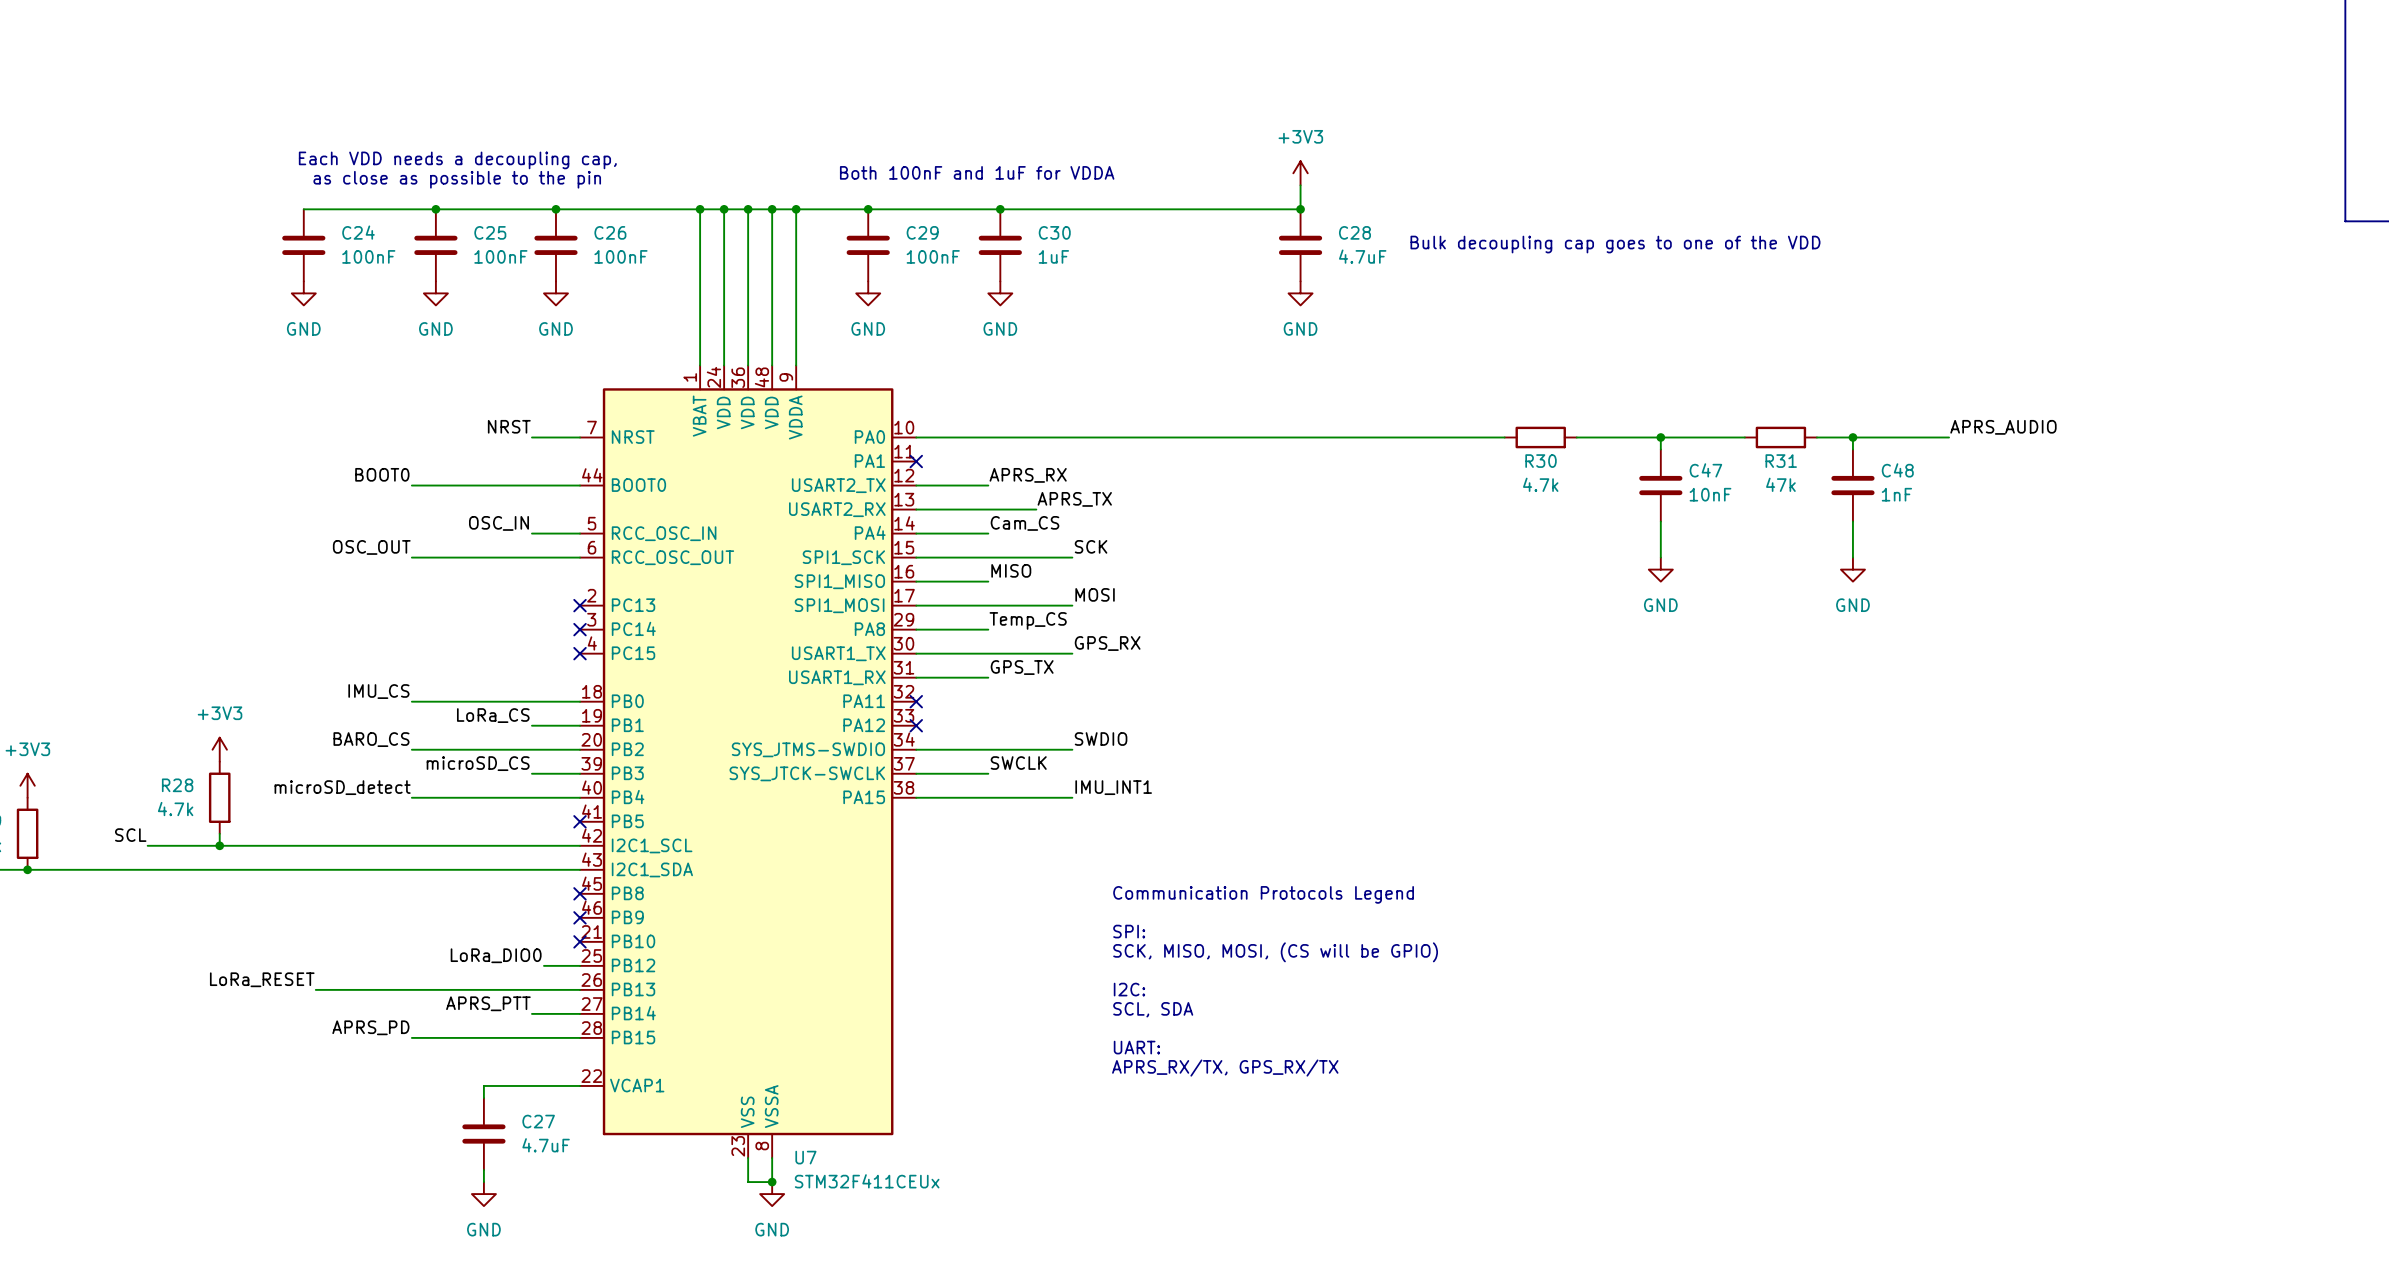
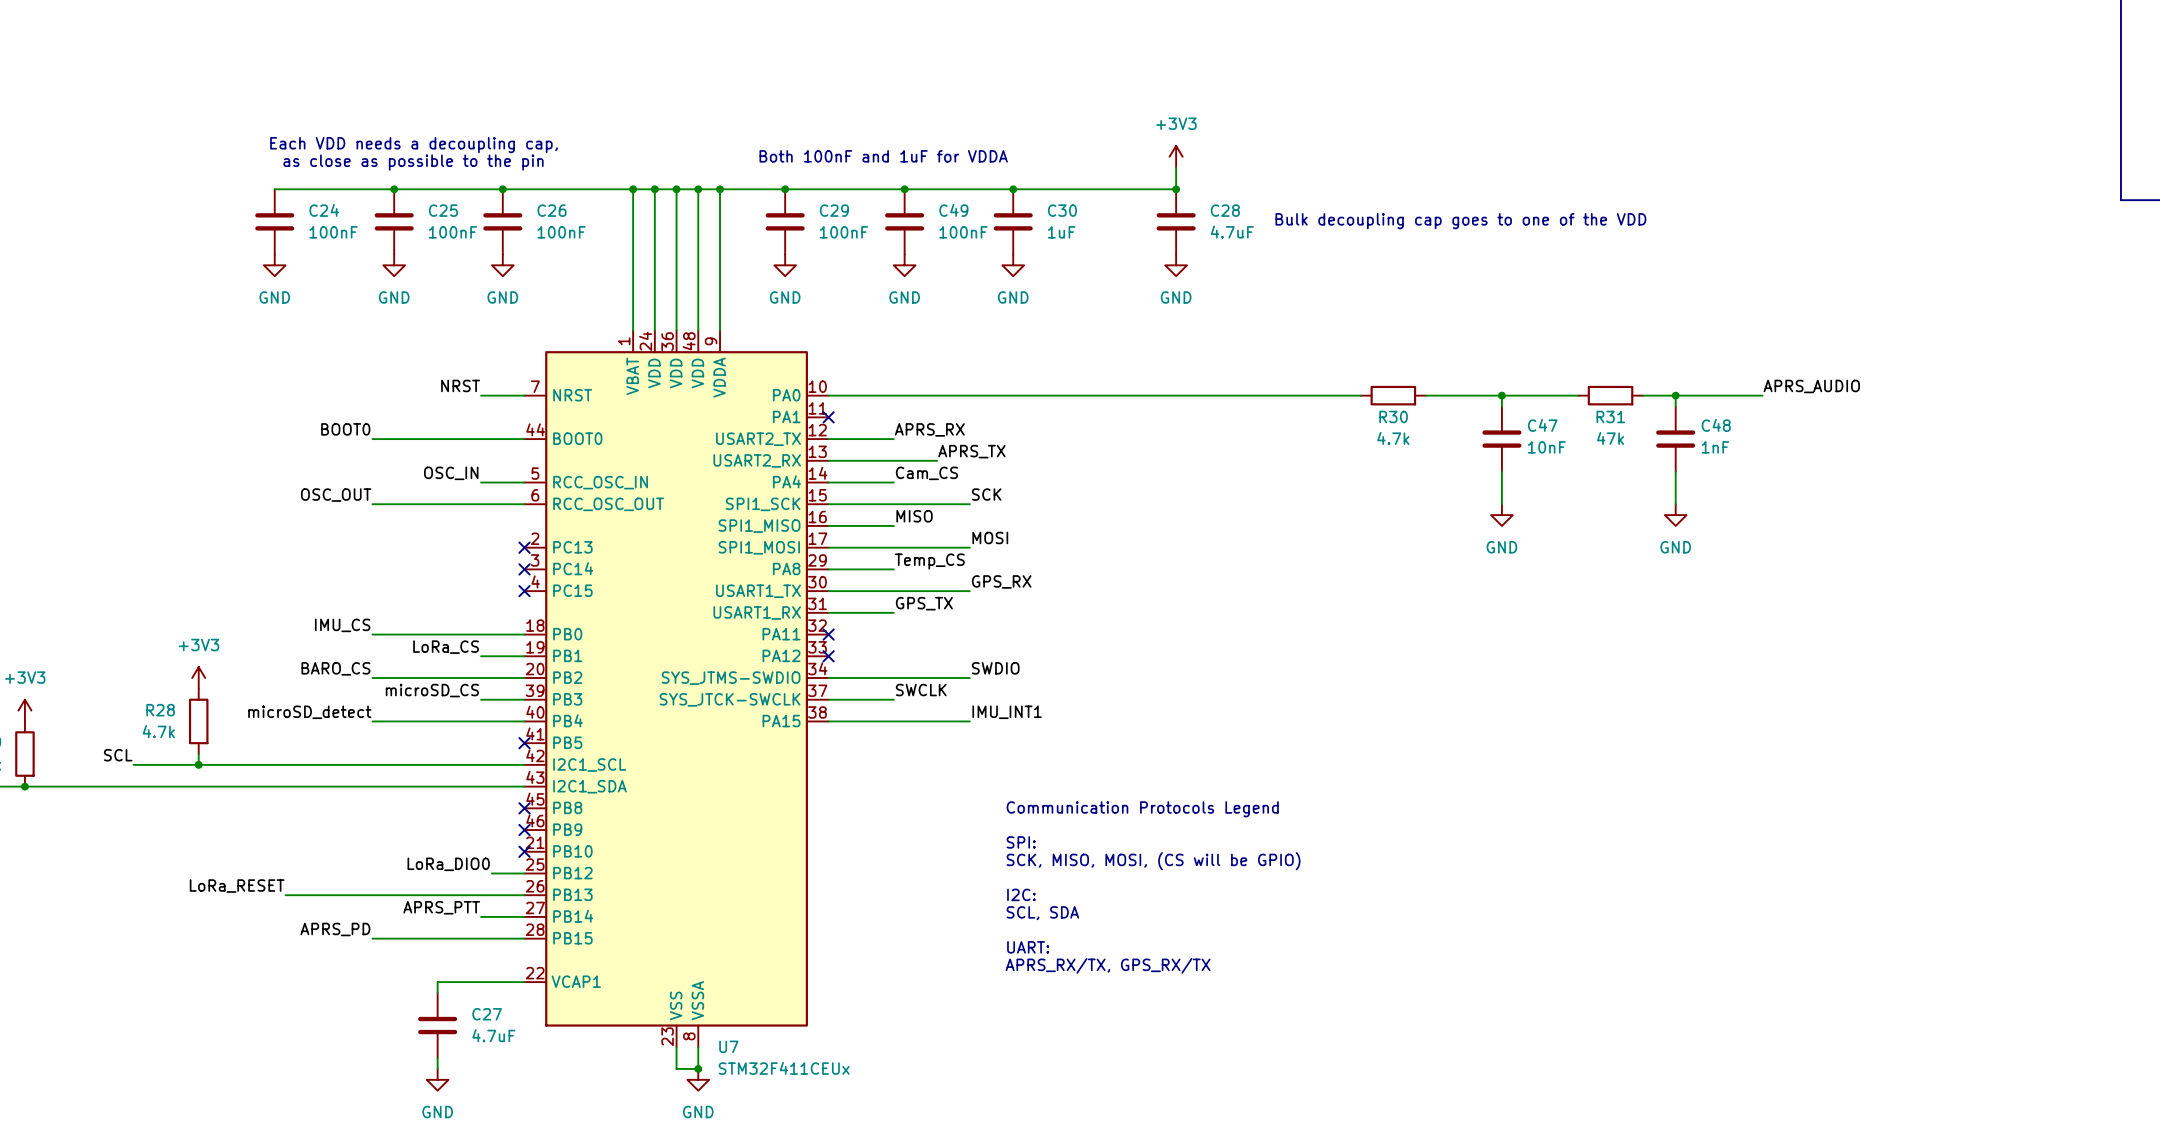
junction: none -> (1013, 189)
C30 name: C30 (1054, 232) -> C49 (953, 210)
C30: none -> 1uF (1013, 221)
C30 value: 1uF (1053, 256) -> 100nF (963, 232)
power symbol: none -> GND (1013, 265)

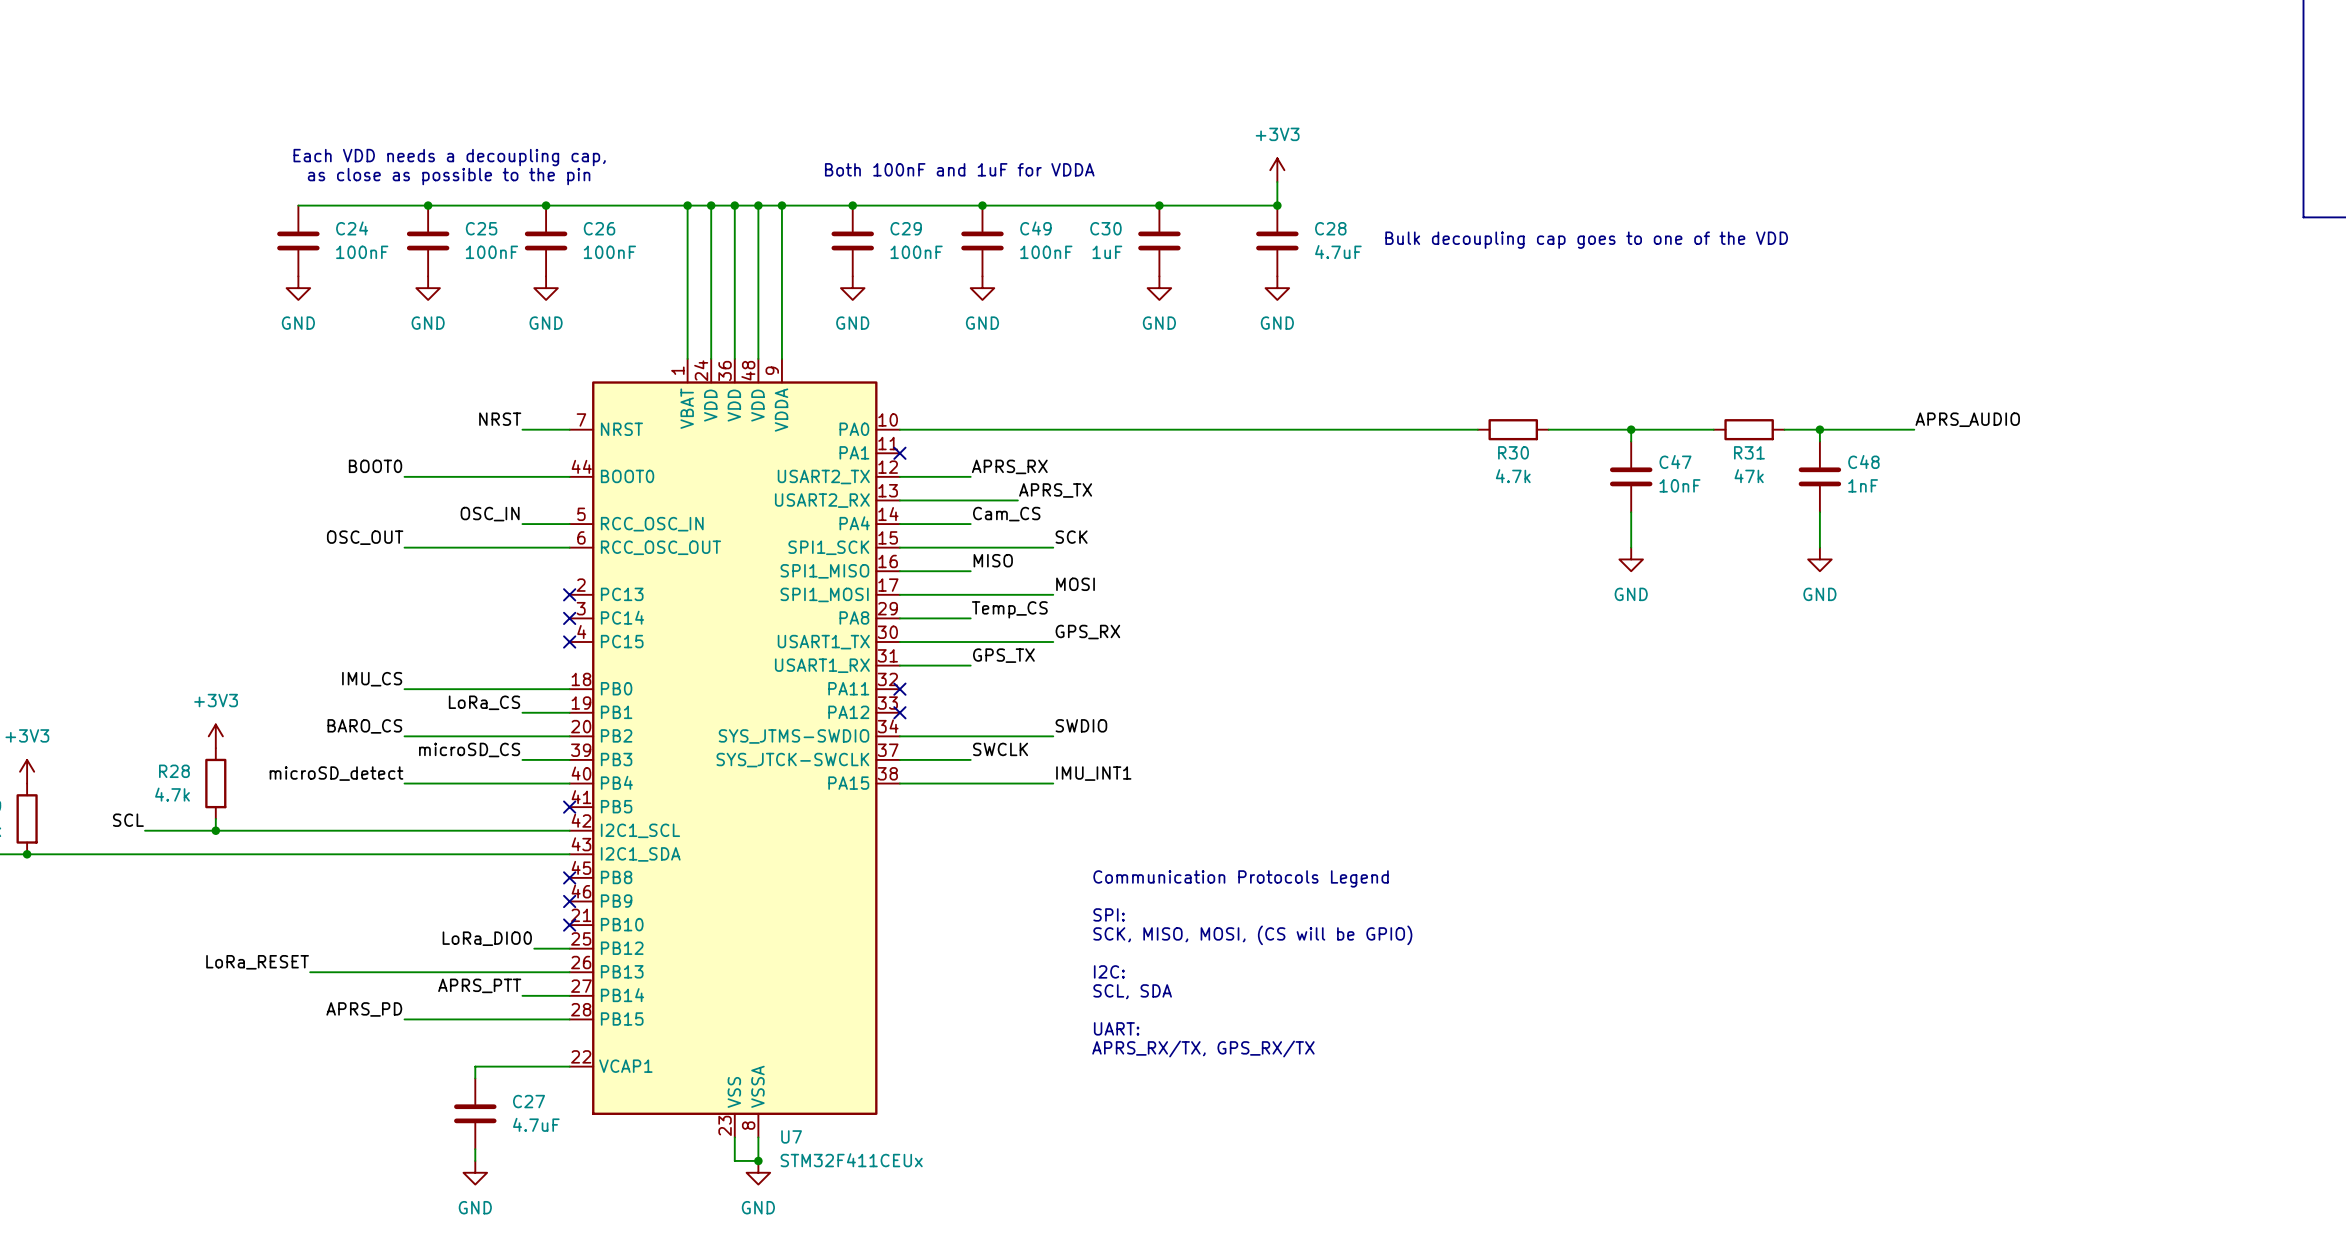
junction: (1013, 189) -> none
junction: none -> (1159, 205)
C30 name position: C30 (1062, 210) -> C30 (1105, 228)
C30 position: (1013, 221) -> (1159, 240)
C30 value position: 1uF (1061, 232) -> 1uF (1107, 252)
power symbol position: GND (1013, 265) -> GND (1159, 288)

